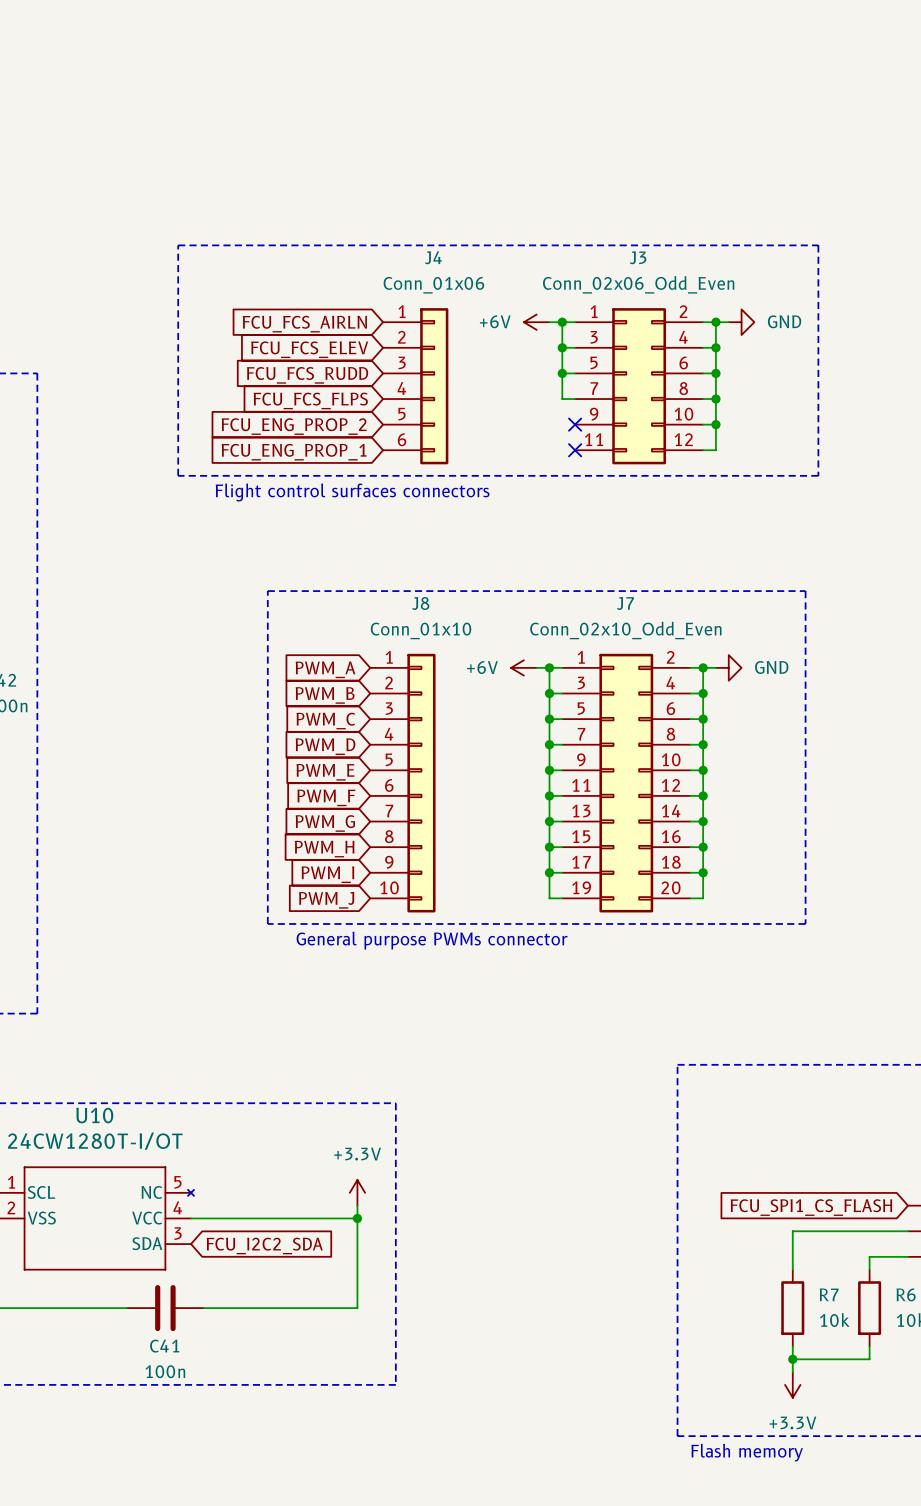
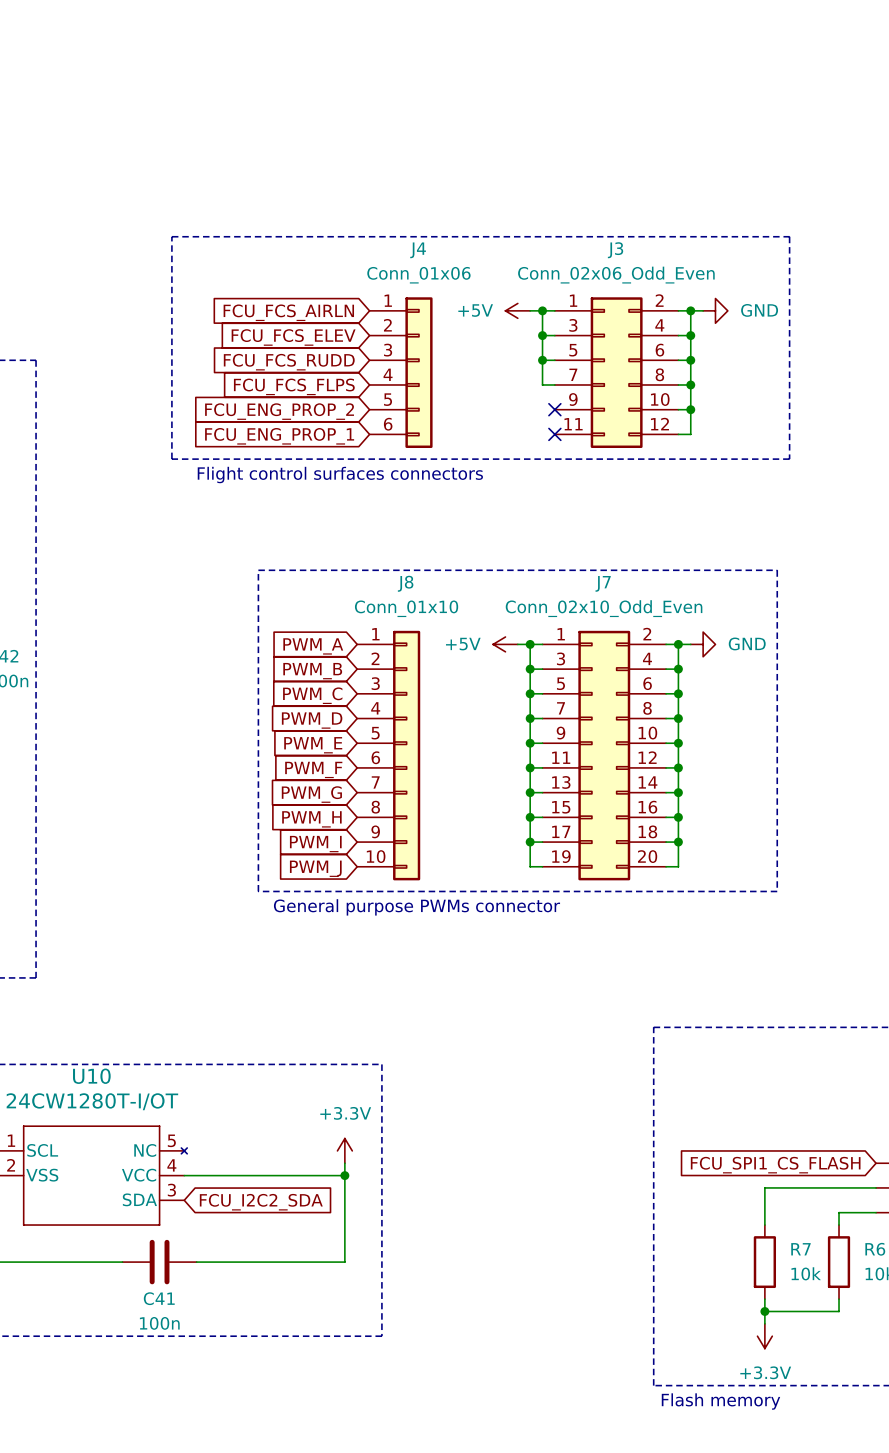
power symbol: +6V (536, 322) -> +5V (517, 310)
power symbol: +6V (523, 667) -> +5V (505, 644)

